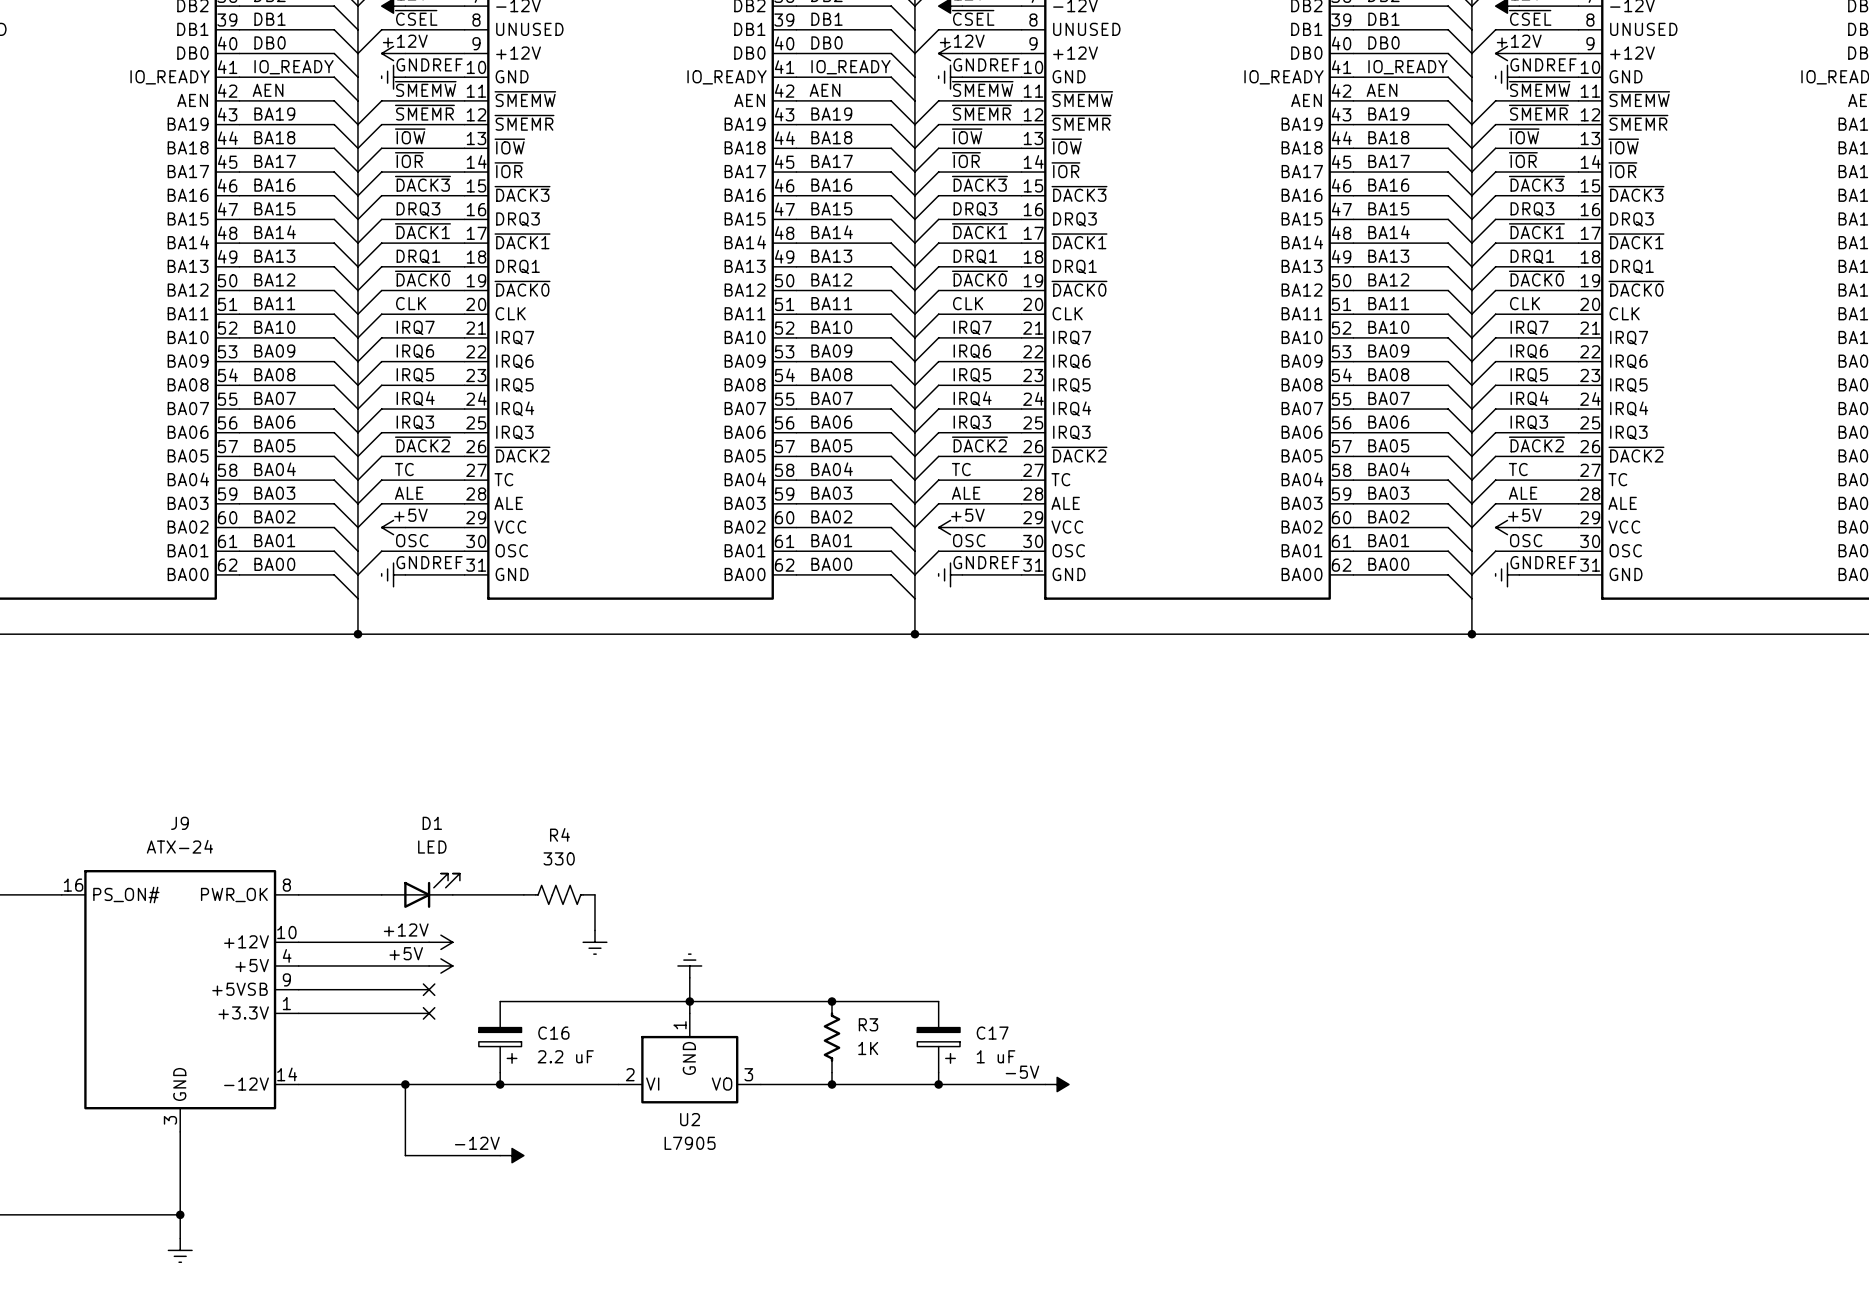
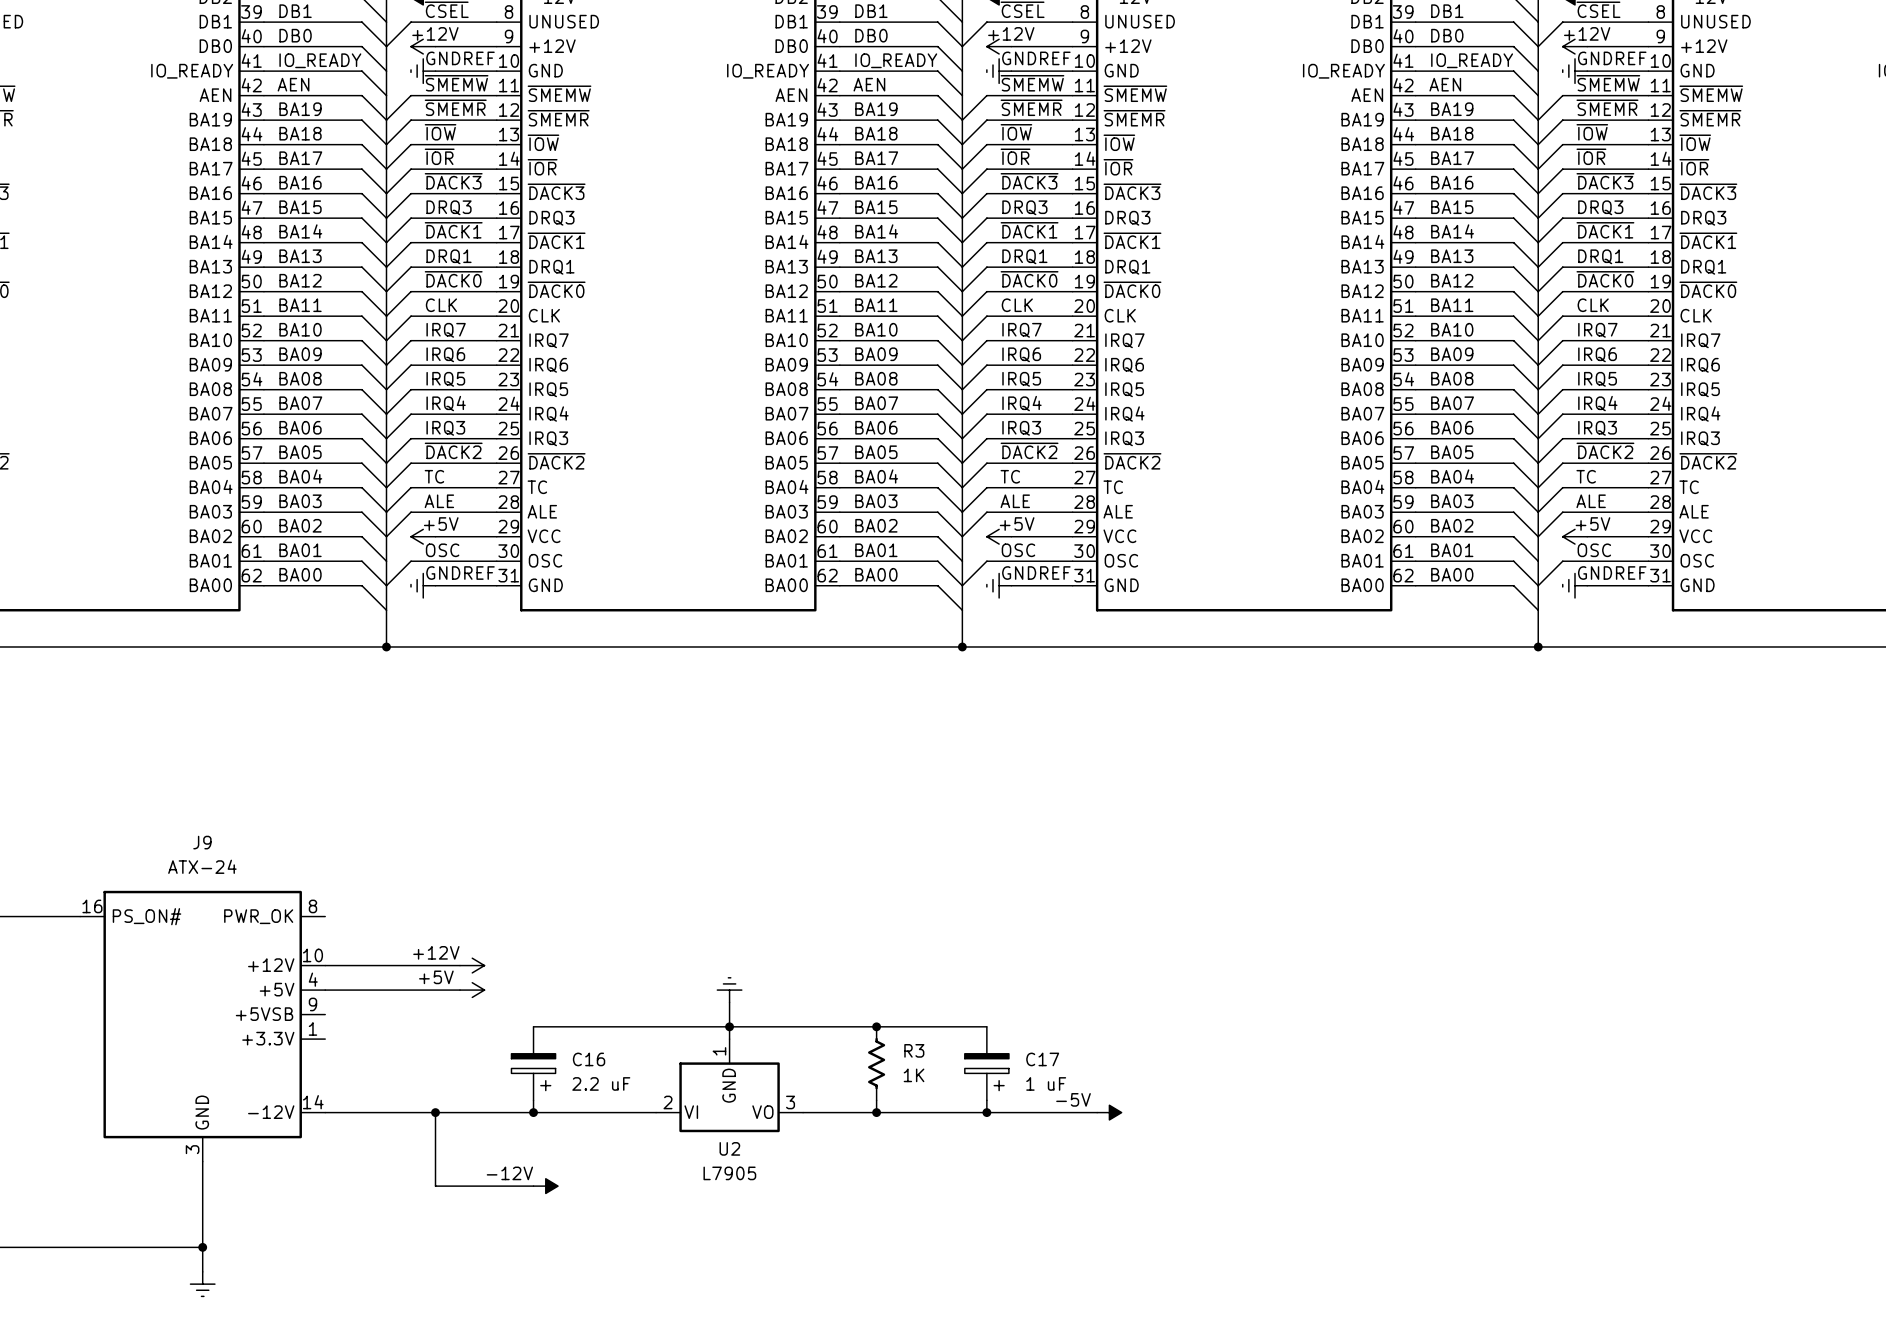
D1: LED (420, 890) -> none
wire: (298, 894) (381, 894) -> none
wire: (452, 894) (523, 894) -> none
R4: 330 (559, 894) -> none
wire: (594, 894) (594, 930) -> none
power symbol: (594, 942) -> none
wire: (298, 989) (429, 989) -> none
no-connect mark: (429, 989) -> none
wire: (298, 1013) (429, 1013) -> none
no-connect mark: (429, 1013) -> none

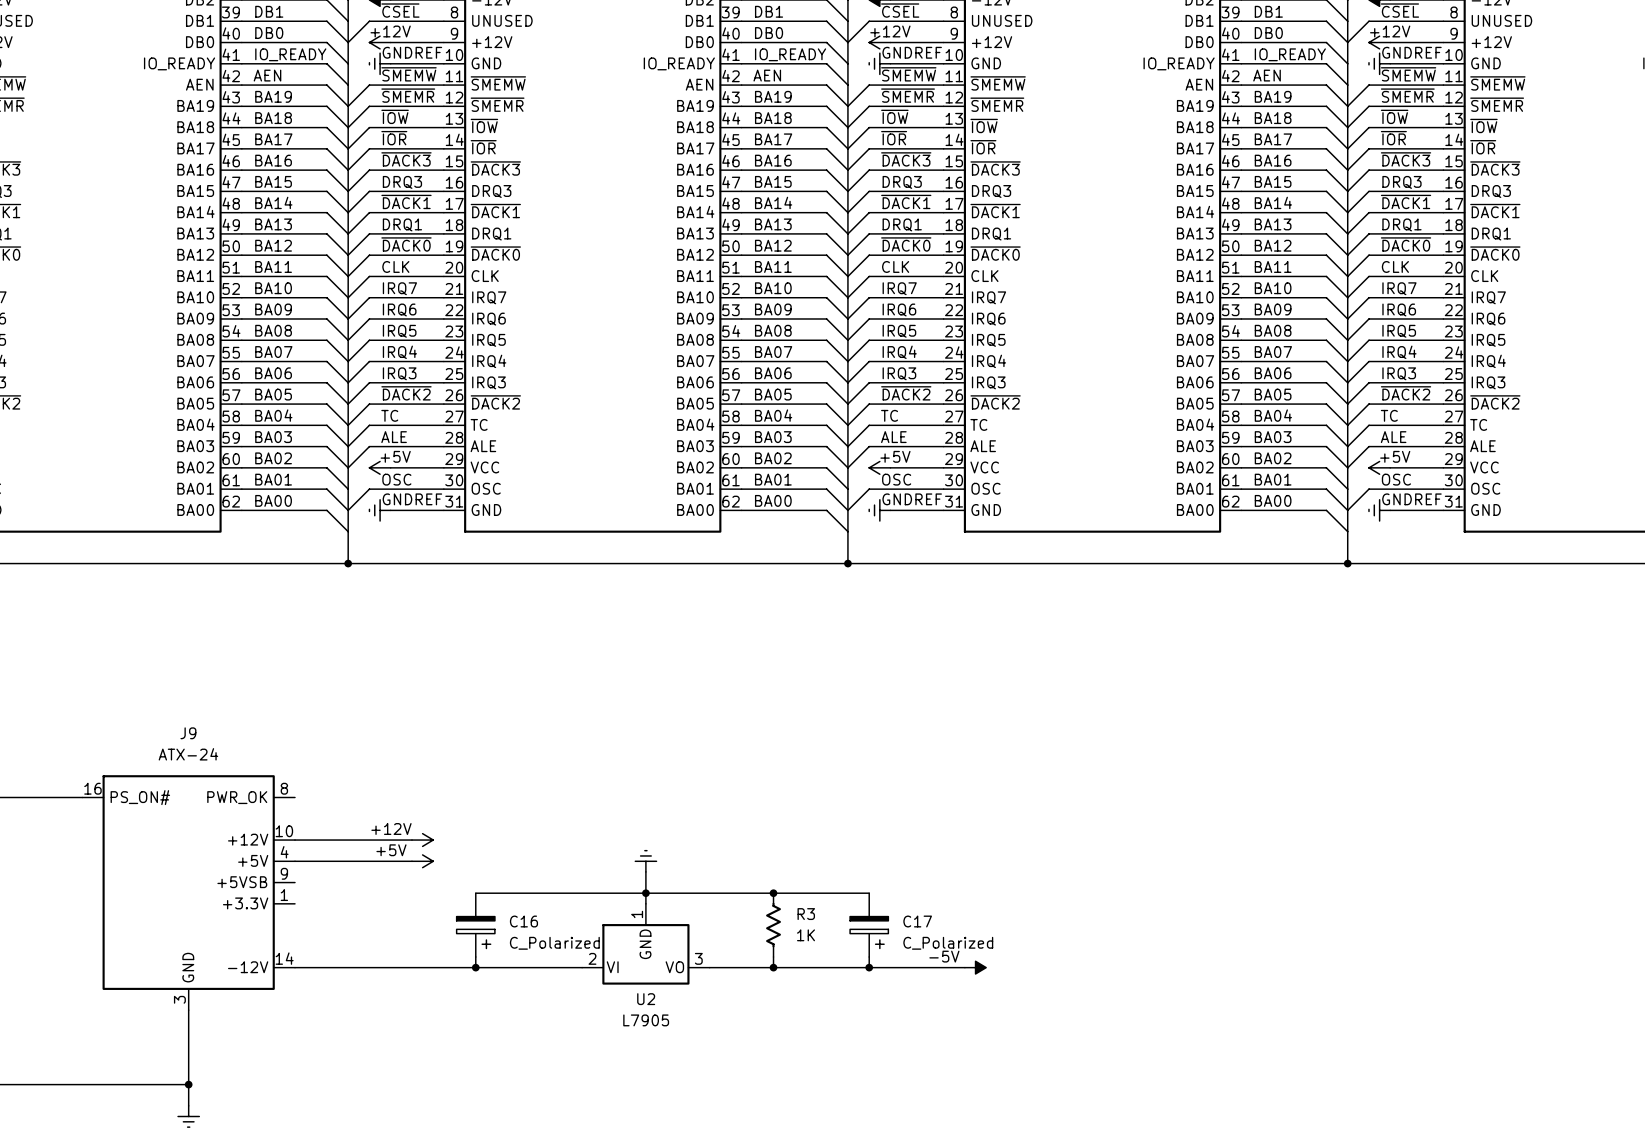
C16 value: 2.2 uF (601, 1083) -> C_Polarized (554, 943)
C17 value: 1 uF (1046, 1083) -> C_Polarized (948, 943)
wire: (435, 1112) (435, 1186) (533, 1186) -> none
junction: (435, 1112) -> none
power symbol: -12V (545, 1186) -> none

